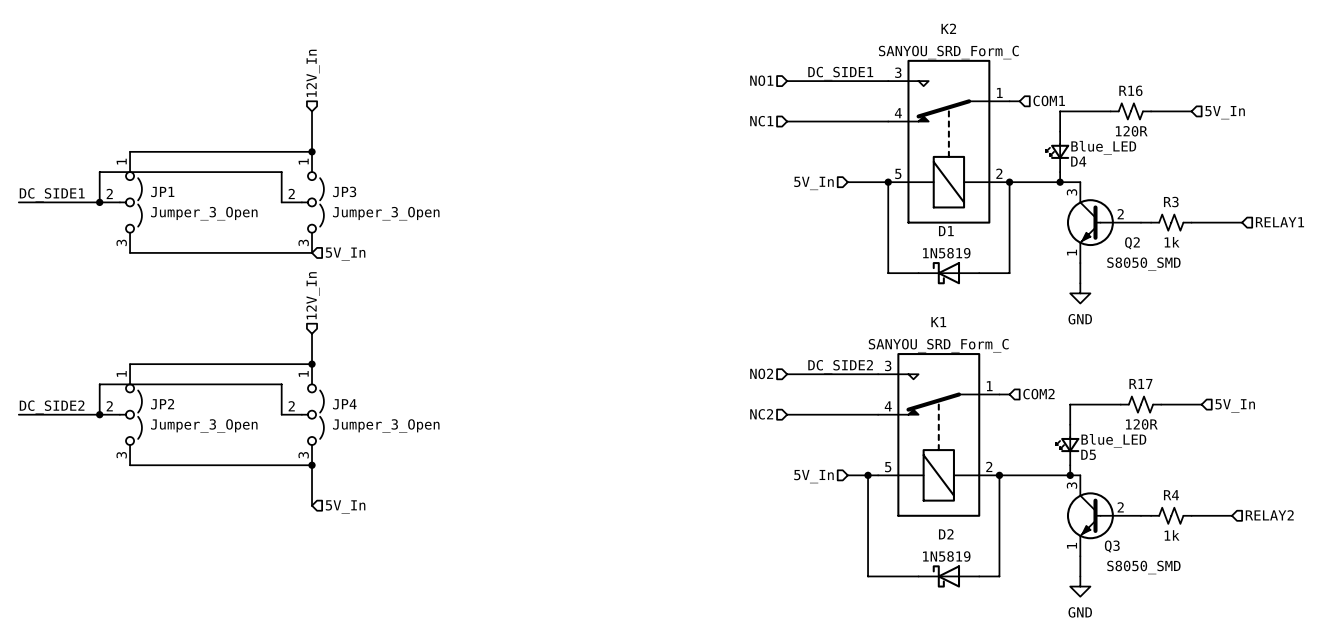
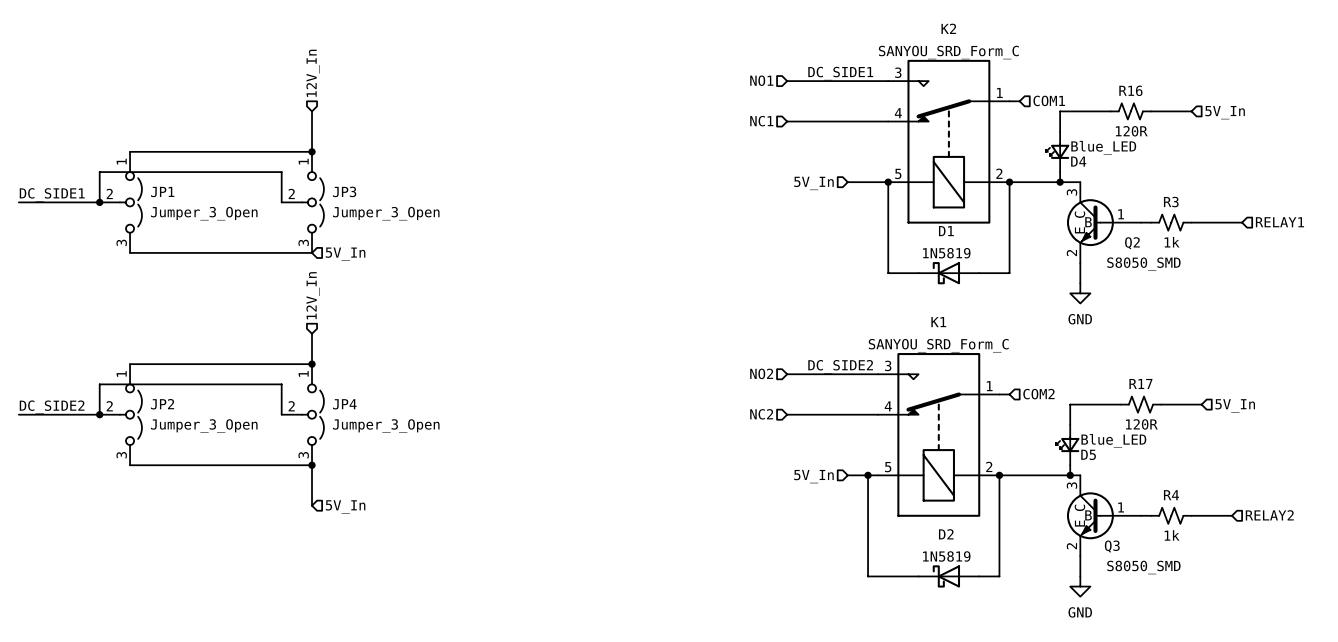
Q2 pin name: none -> C (1079, 214)
Q2 pin number: 2 (1120, 214) -> 1 (1121, 214)
Q2 pin name: none -> B (1088, 222)
Q2 pin name: none -> E (1079, 230)
Q2 pin number: 1 (1071, 252) -> 2 (1071, 253)
Q3 pin name: none -> C (1079, 507)
Q3 pin number: 2 (1120, 507) -> 1 (1121, 507)
Q3 pin name: none -> B (1088, 515)
Q3 pin name: none -> E (1079, 523)
Q3 pin number: 1 (1071, 545) -> 2 (1071, 546)

